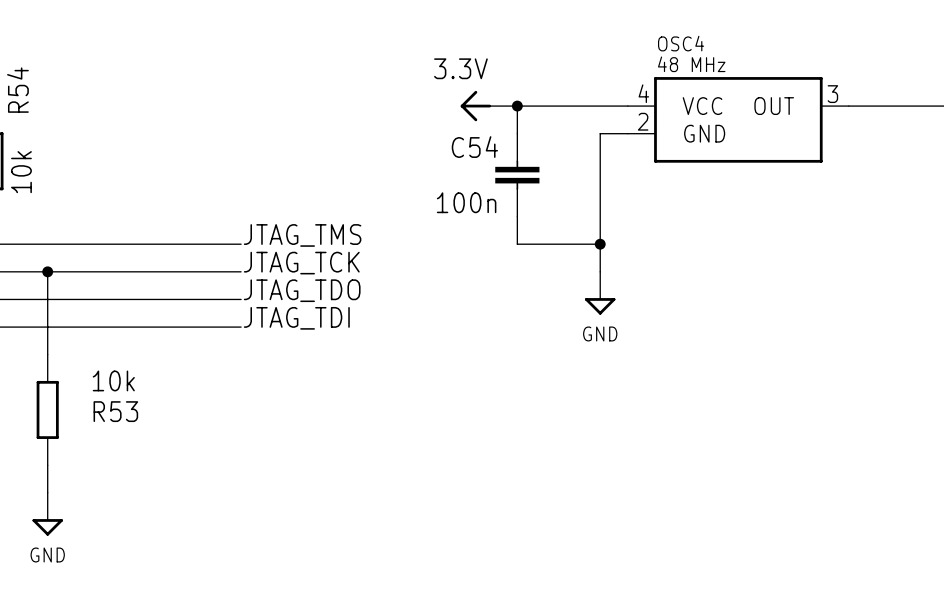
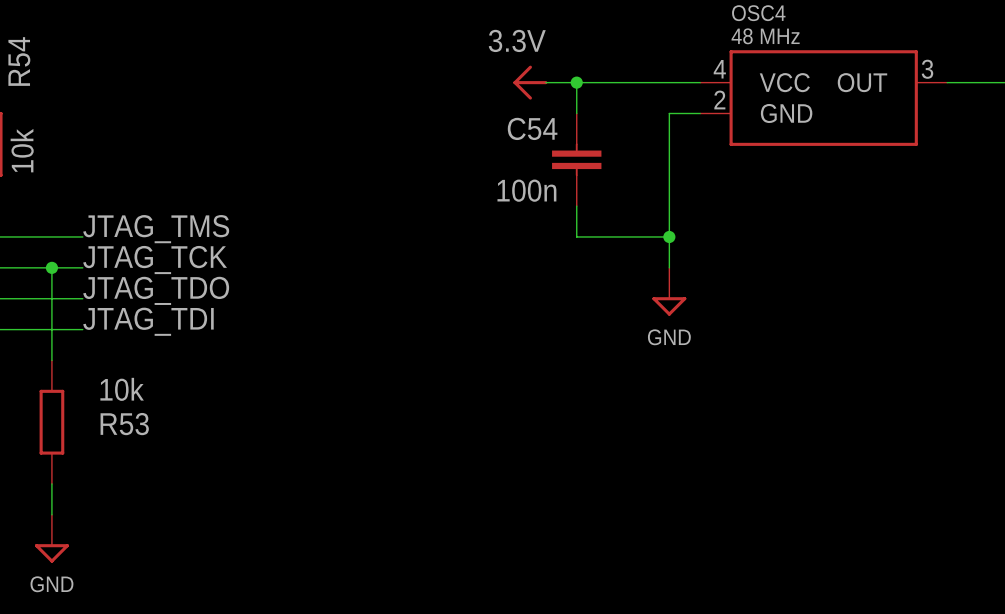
label position: JTAG_TMS (302, 235) -> JTAG_TMS (156, 229)
wire: (75, 244) (241, 244) -> none
label position: JTAG_TCK (301, 263) -> JTAG_TCK (155, 260)
wire: (75, 271) (241, 271) -> none
label position: JTAG_TDO (302, 290) -> JTAG_TDO (156, 290)
wire: (75, 299) (241, 299) -> none
label position: JTAG_TDI (296, 318) -> JTAG_TDI (148, 321)
wire: (75, 327) (241, 327) -> none

